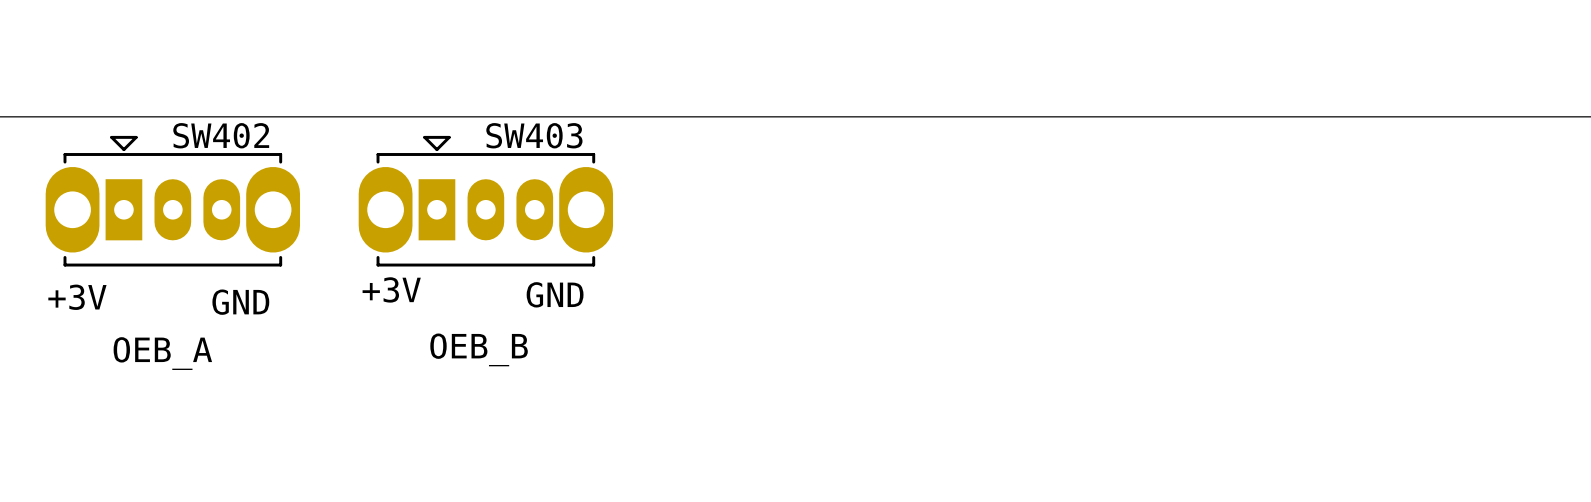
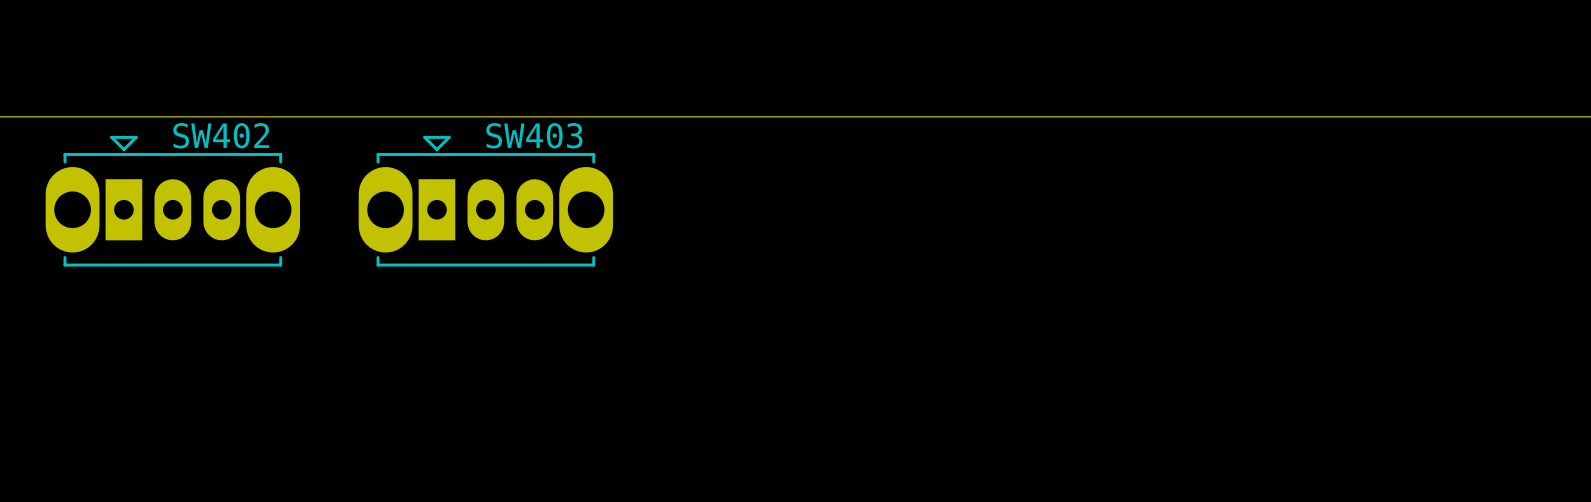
text: +3V (391, 289) -> none
text: GND (555, 294) -> none
text: +3V (77, 297) -> none
text: GND (240, 302) -> none
text: OEB_B (479, 349) -> none
text: OEB_A (162, 353) -> none

